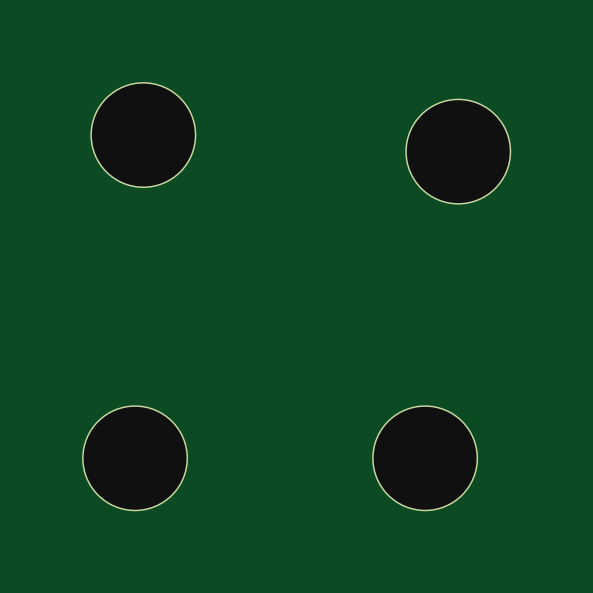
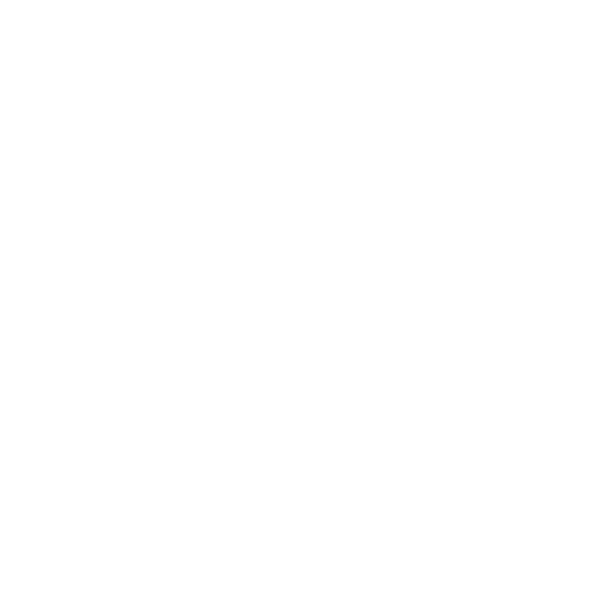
part: (143, 135) -> none
part: (458, 151) -> none
part: (135, 458) -> none
part: (425, 458) -> none

